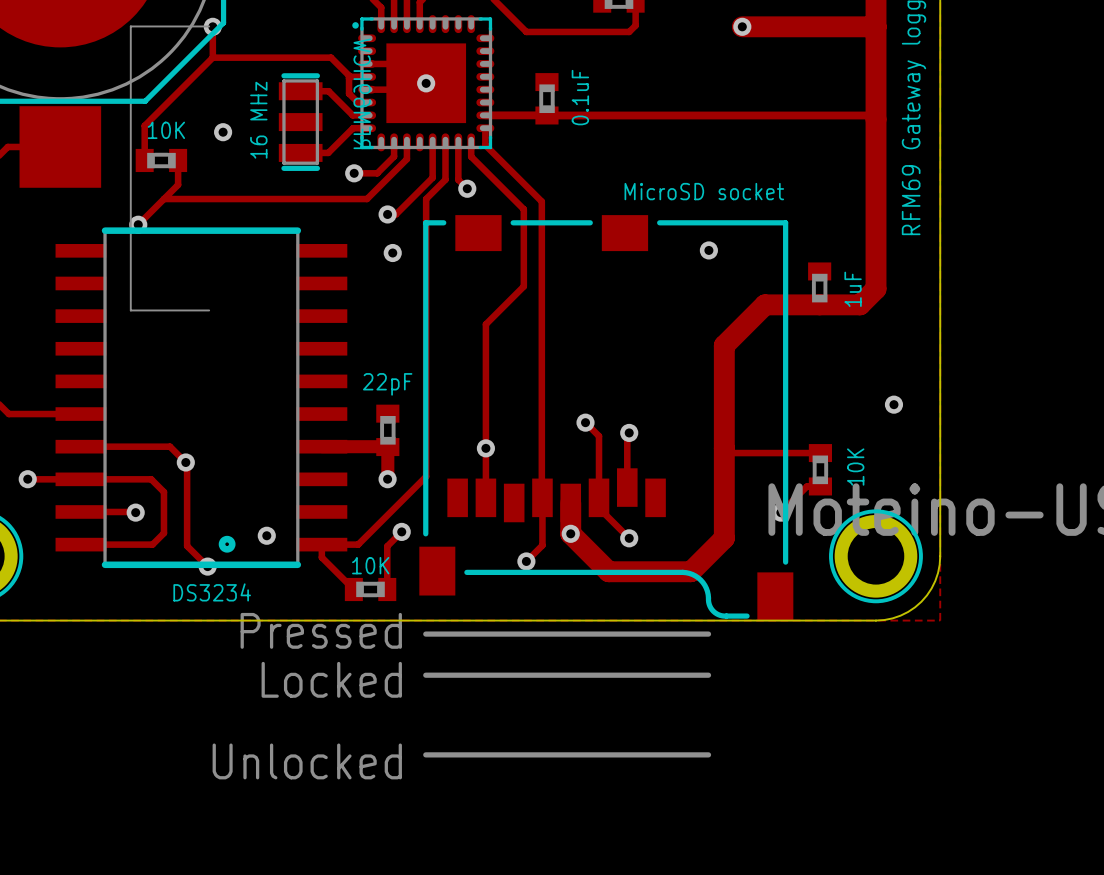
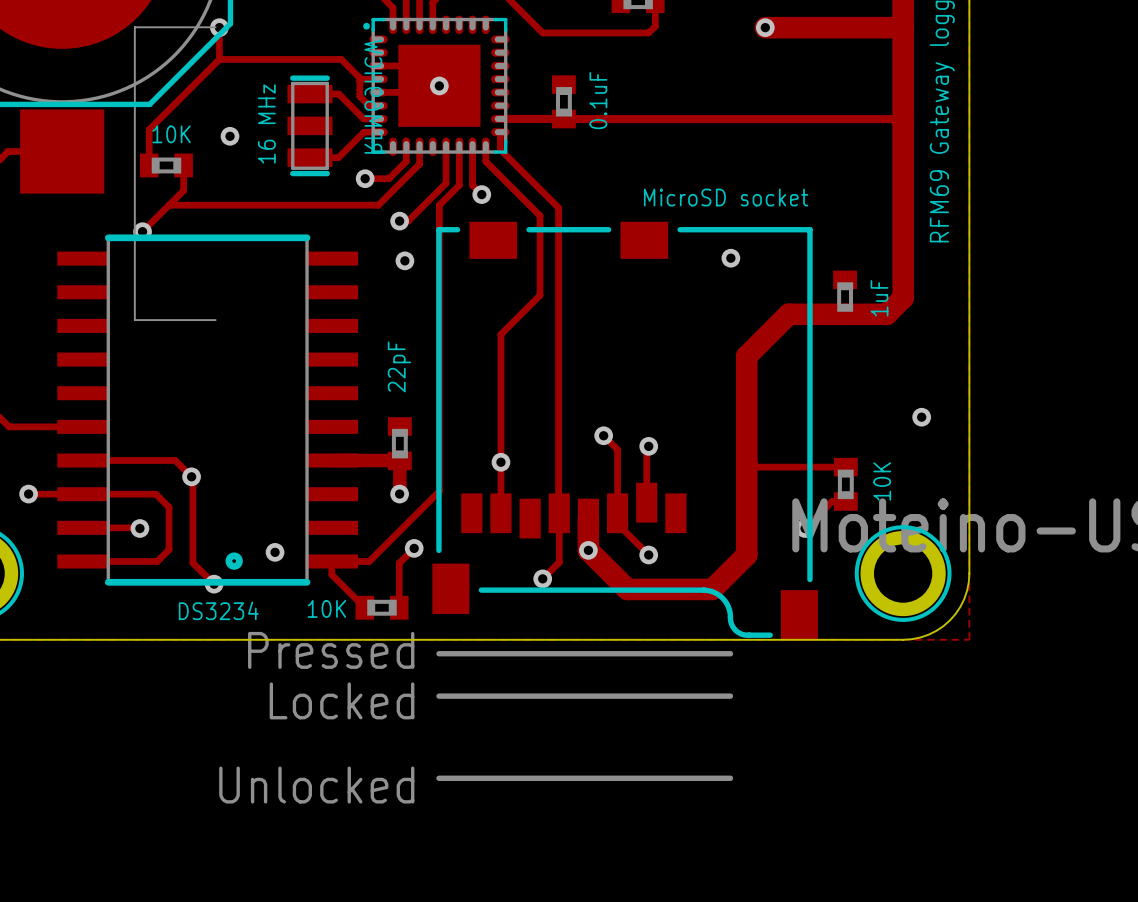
part value rotation: 0° (387, 384) -> 90° counterclockwise (399, 366)
part value position: 10K (370, 565) -> 10K (326, 608)

